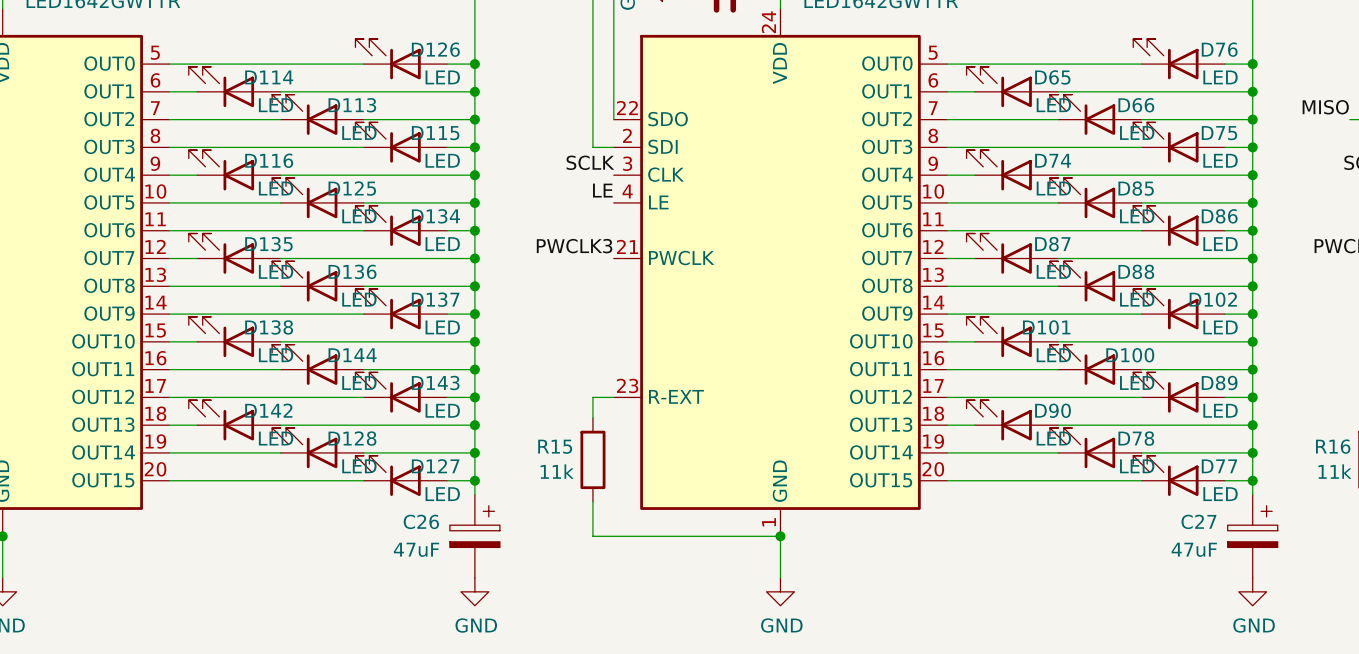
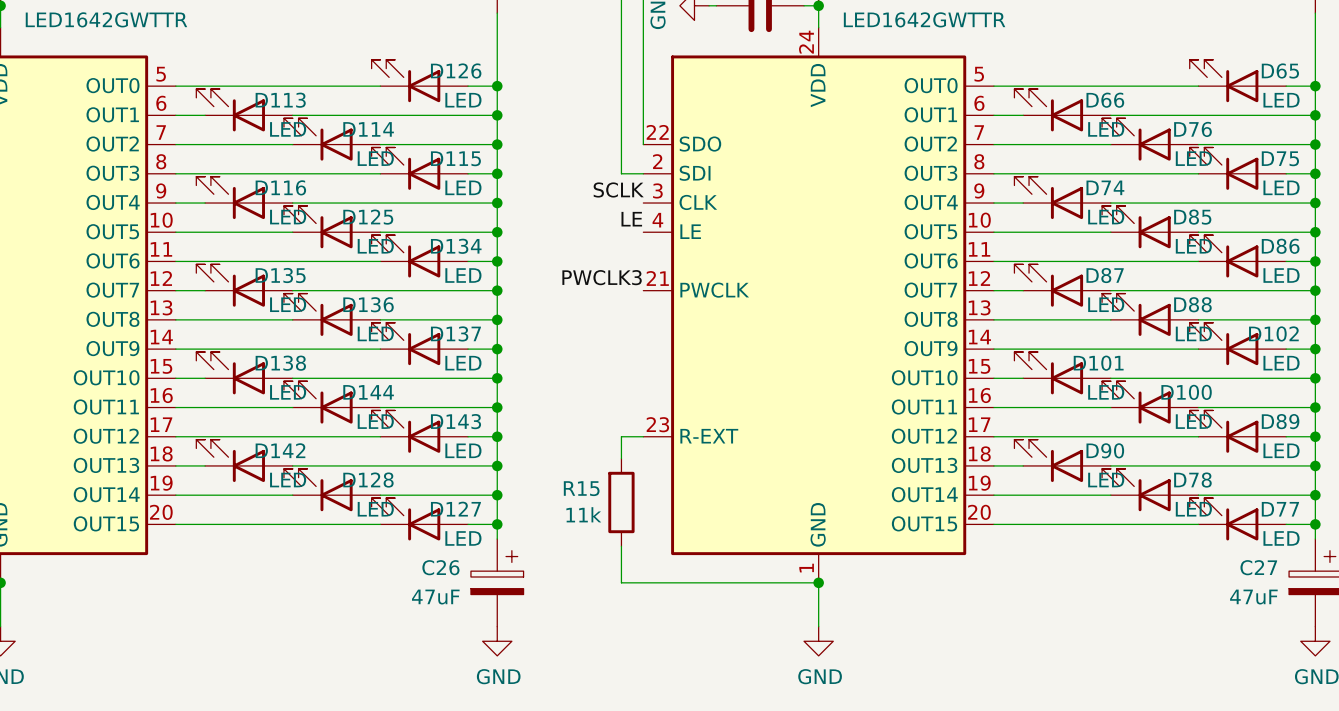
D76 name: D76 (1219, 49) -> D65 (1280, 70)
D114 name: D114 (269, 77) -> D113 (280, 100)
D65 name: D65 (1052, 77) -> D66 (1105, 100)
D113 name: D113 (352, 105) -> D114 (368, 129)
D66 name: D66 (1136, 105) -> D76 (1192, 129)

